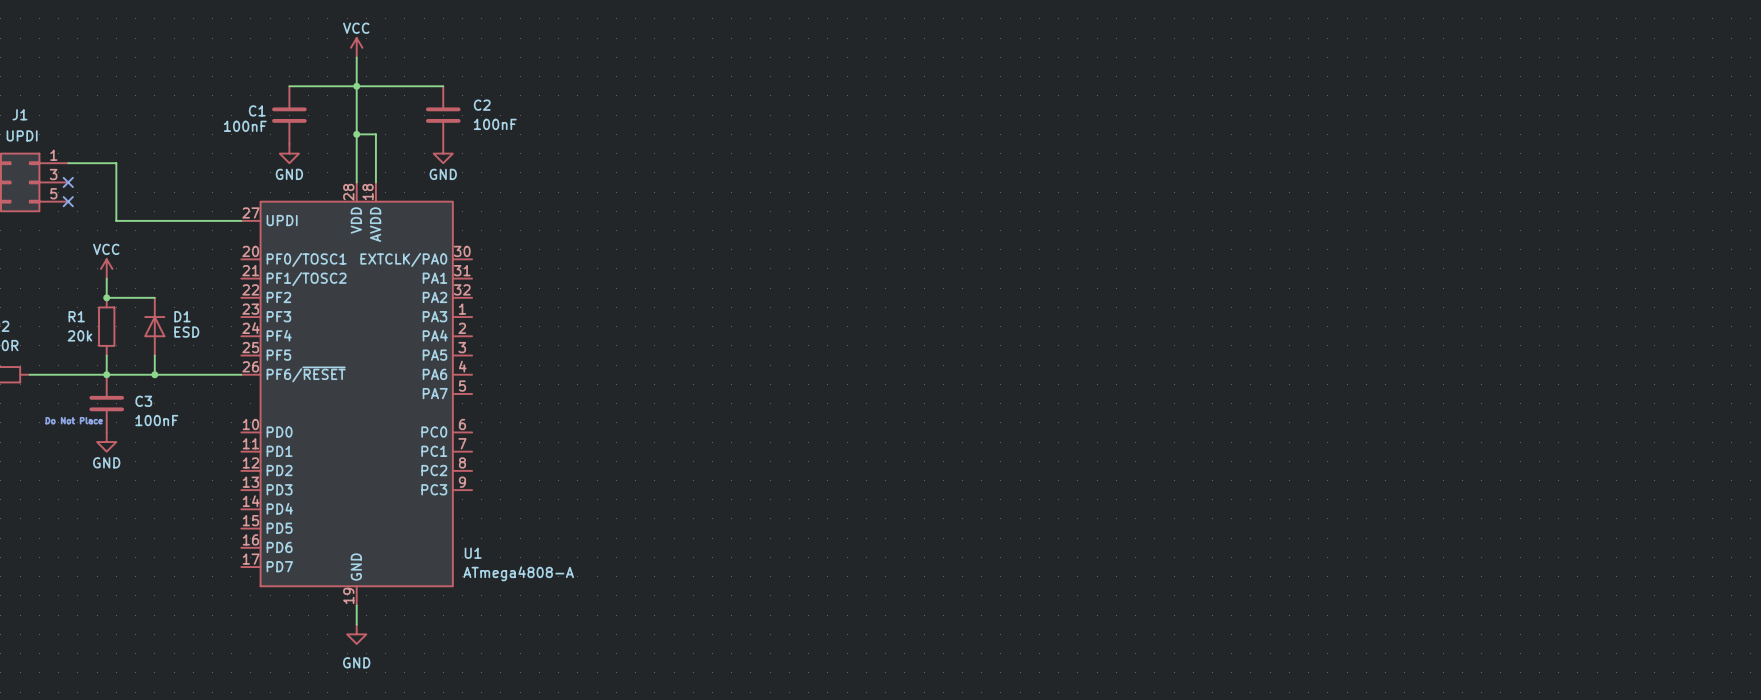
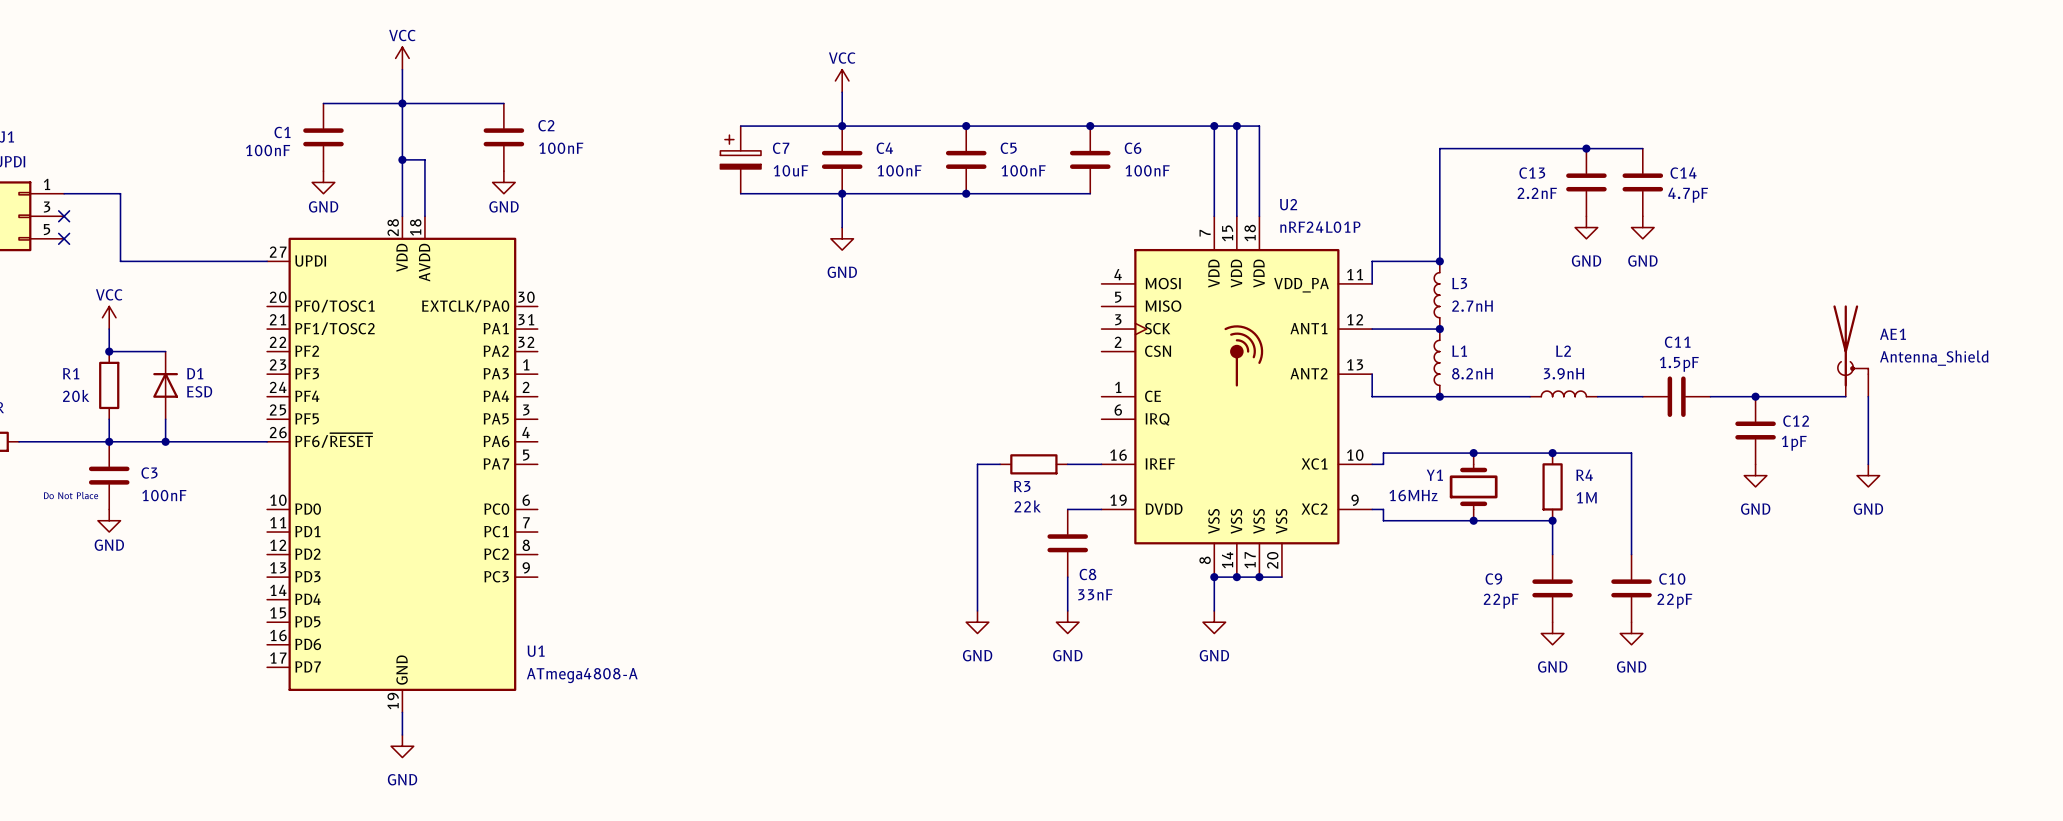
power symbol: none -> VCC (842, 80)
wire: none -> (842, 92) (842, 126)
wire: none -> (740, 126) (1259, 126) (1259, 216)
junction: none -> (842, 126)
junction: none -> (966, 126)
junction: none -> (1090, 126)
wire: none -> (1214, 126) (1214, 216)
junction: none -> (1214, 126)
wire: none -> (1236, 126) (1236, 216)
junction: none -> (1236, 126)
junction: none -> (1586, 148)
wire: none -> (1642, 148) (1439, 148) (1439, 261) (1372, 261) (1372, 283)
C7: none -> 10uF (740, 159)
C4: none -> 100nF (842, 159)
C5: none -> 100nF (966, 159)
C6: none -> 100nF (1090, 159)
C13: none -> 2.2nF (1586, 182)
C14: none -> 4.7pF (1642, 182)
wire: none -> (740, 193) (1090, 193)
wire: none -> (842, 193) (842, 227)
junction: none -> (842, 193)
junction: none -> (966, 193)
power symbol: none -> GND (1586, 227)
power symbol: none -> GND (1642, 227)
power symbol: none -> GND (842, 238)
junction: none -> (1439, 261)
L3: none -> 2.7nH (1437, 295)
wire: none -> (1372, 329) (1439, 329)
junction: none -> (1439, 329)
AE1: none -> Antenna_Shield (1850, 351)
L1: none -> 8.2nH (1437, 362)
wire: none -> (1372, 374) (1372, 396) (1530, 396)
L2: none -> 3.9nH (1563, 393)
U2: none -> nRF24L01P (1236, 396)
junction: none -> (1439, 396)
wire: none -> (1597, 396) (1642, 396)
C11: none -> 1.5pF (1676, 396)
wire: none -> (1710, 396) (1845, 396)
junction: none -> (1755, 396)
wire: none -> (1868, 396) (1868, 464)
C12: none -> 1pF (1755, 430)
junction: none -> (1473, 453)
junction: none -> (1552, 453)
wire: none -> (1000, 464) (977, 464) (977, 610)
R3: none -> 22k (1033, 464)
wire: none -> (1067, 464) (1101, 464)
wire: none -> (1372, 464) (1383, 464) (1383, 453) (1631, 453) (1631, 554)
power symbol: none -> GND (1755, 475)
power symbol: none -> GND (1868, 475)
Y1: none -> 16MHz (1473, 486)
R4: none -> 1M (1552, 486)
wire: none -> (1067, 509) (1101, 509)
wire: none -> (1372, 509) (1383, 509) (1383, 520) (1552, 520) (1552, 554)
junction: none -> (1473, 520)
junction: none -> (1552, 520)
C8: none -> 33nF (1067, 543)
wire: none -> (1067, 577) (1067, 610)
junction: none -> (1214, 577)
junction: none -> (1236, 577)
junction: none -> (1259, 577)
wire: none -> (1281, 577) (1214, 577) (1214, 610)
C9: none -> 22pF (1552, 588)
C10: none -> 22pF (1631, 588)
power symbol: none -> GND (977, 622)
power symbol: none -> GND (1067, 622)
power symbol: none -> GND (1214, 622)
power symbol: none -> GND (1552, 633)
power symbol: none -> GND (1631, 633)

